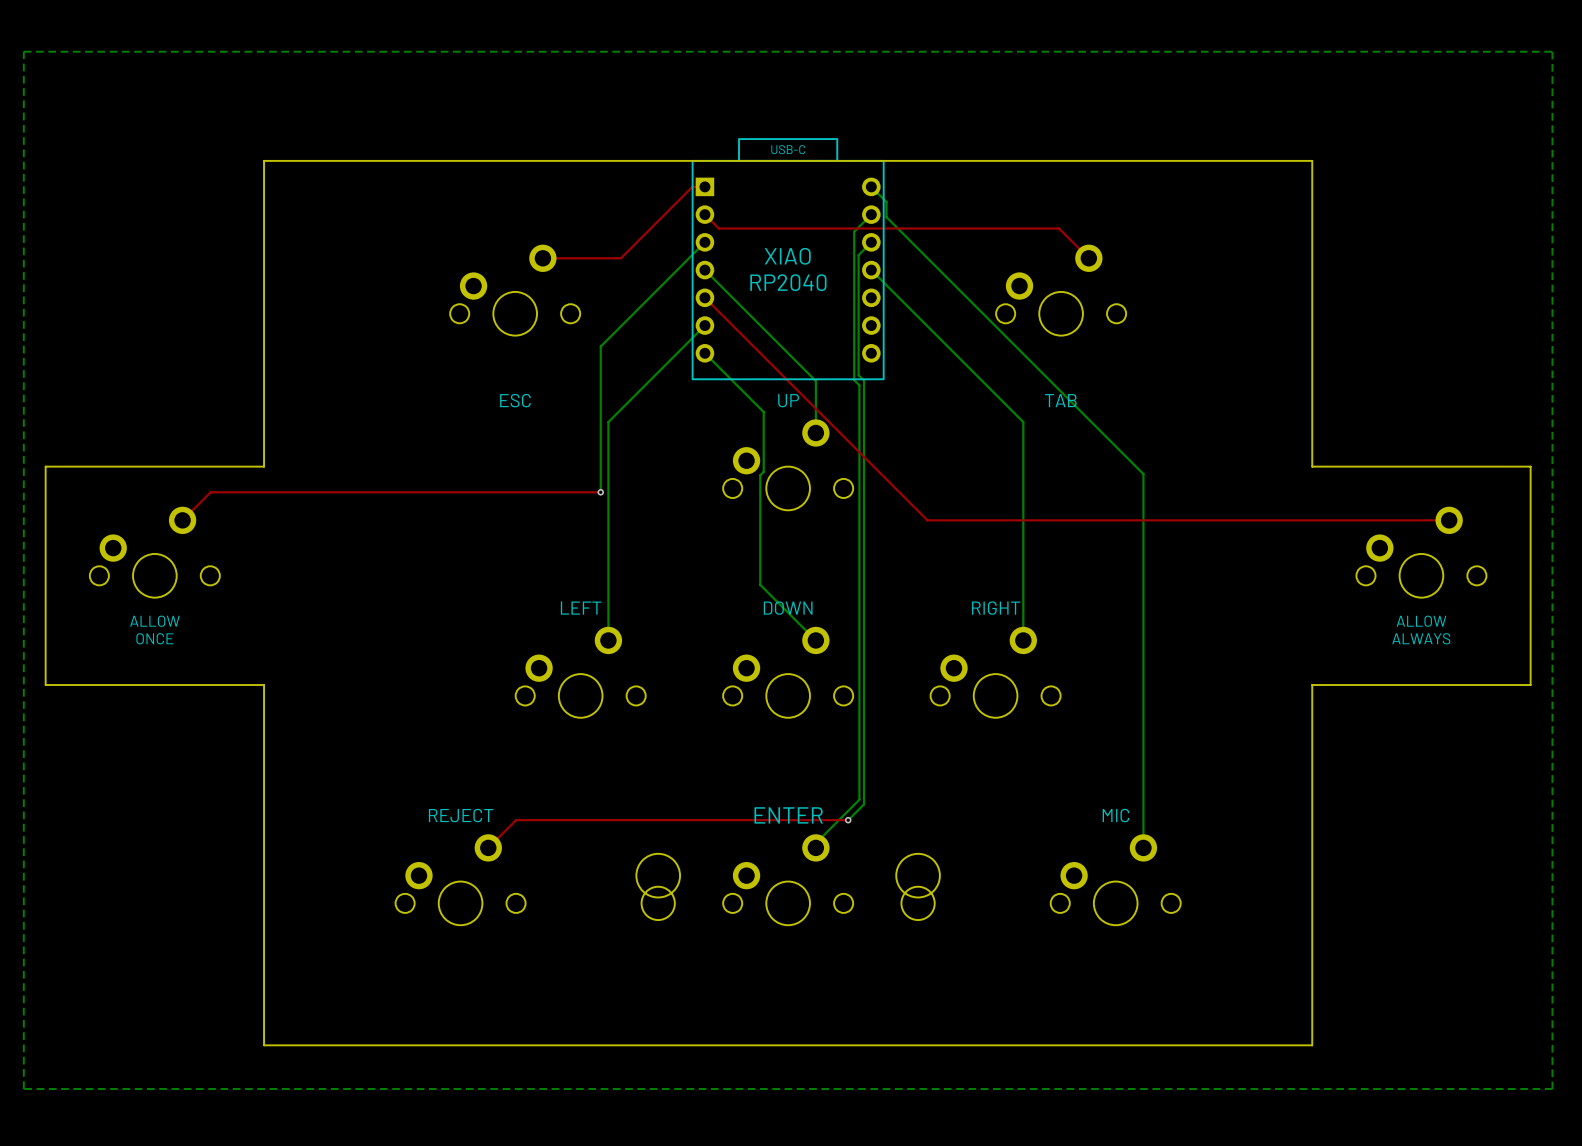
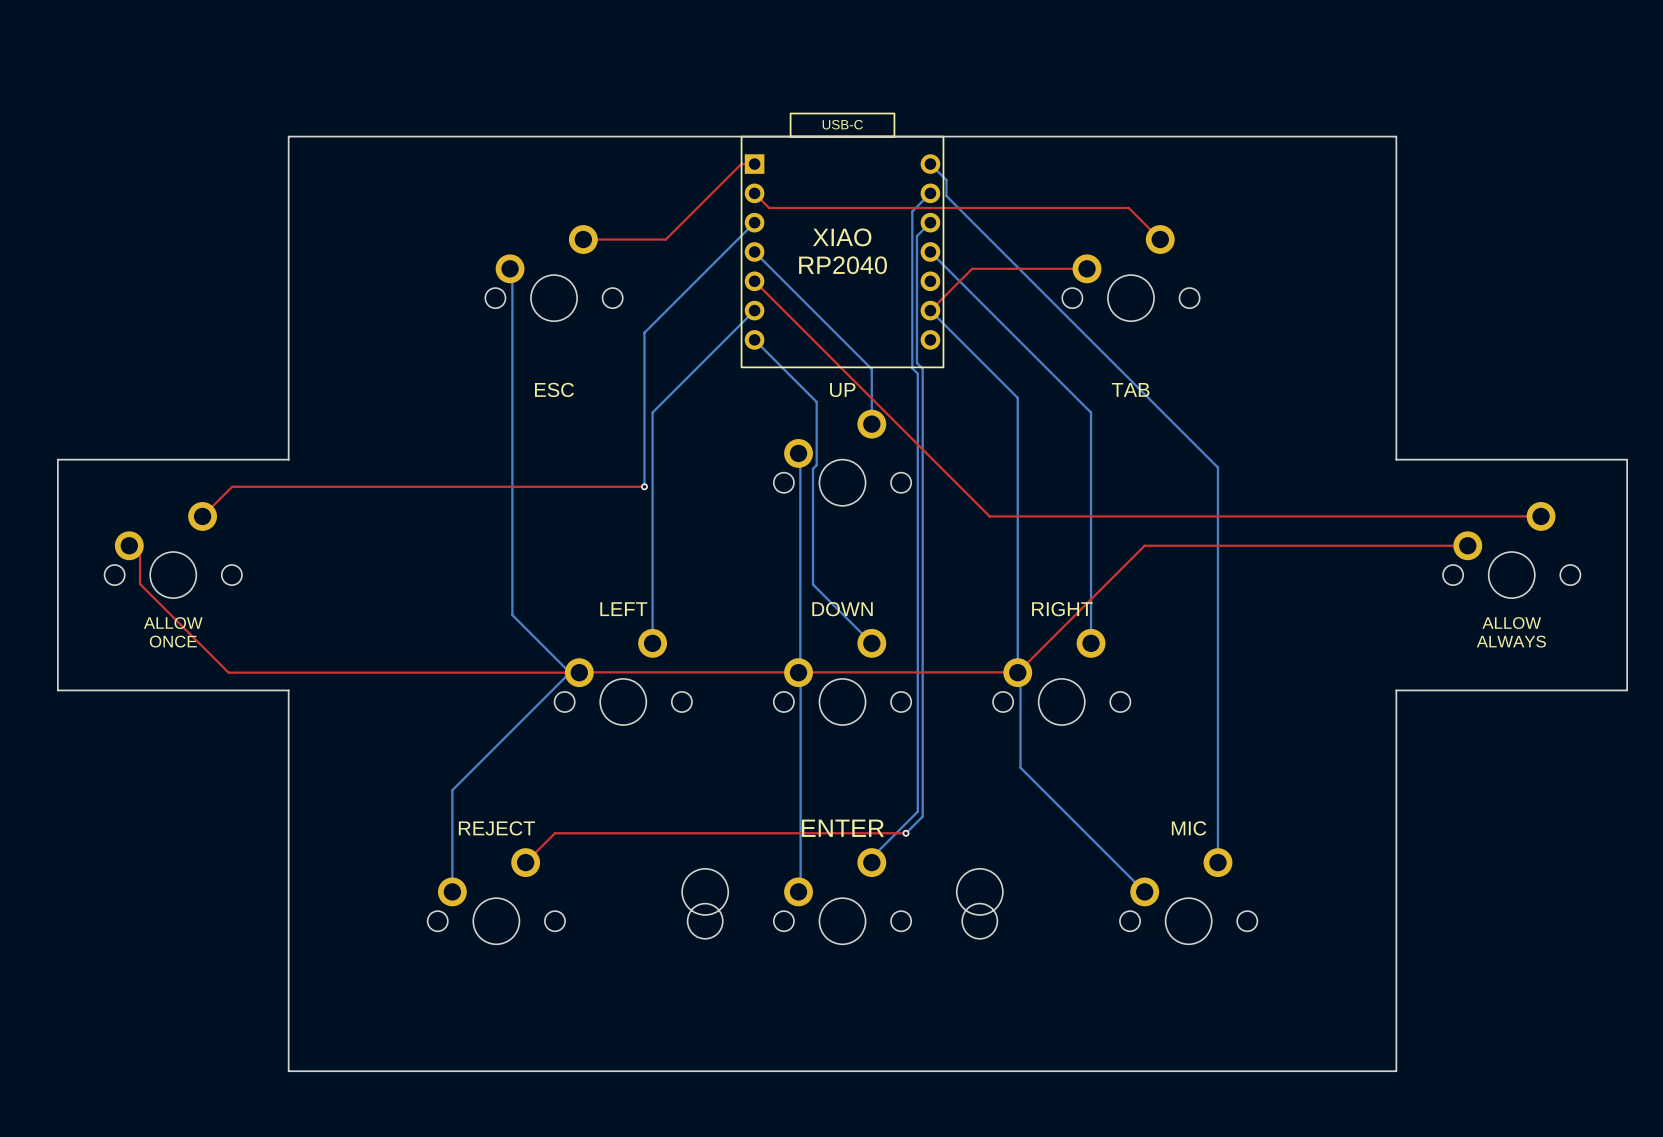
bottom zone outline: (23, 51) (1552, 51) (1552, 1089) (23, 1089) (23, 51) -> none
bottom track: none -> (510, 268) (512, 271) (512, 615) (569, 672)
top track: none -> (1087, 268) (972, 268) (930, 310)
bottom track: none -> (930, 310) (1017, 397) (1017, 672) (1020, 675) (1020, 767) (1144, 891)
bottom track: none -> (798, 453) (800, 455) (800, 670) (798, 672) (800, 674) (800, 889) (798, 891)
top track: none -> (129, 545) (140, 556) (140, 584) (228, 672) (1017, 672) (1144, 545) (1467, 545)
bottom track: none -> (569, 672) (452, 790) (452, 891)

